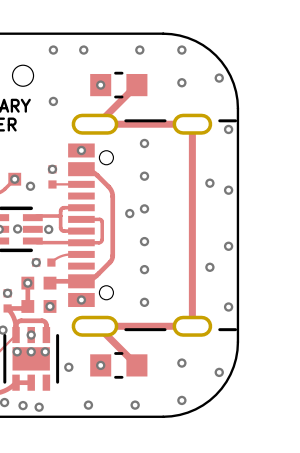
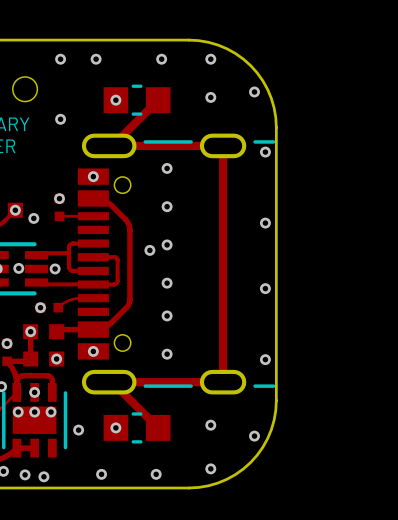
via: (209, 183) -> none
via: (209, 267) -> none

